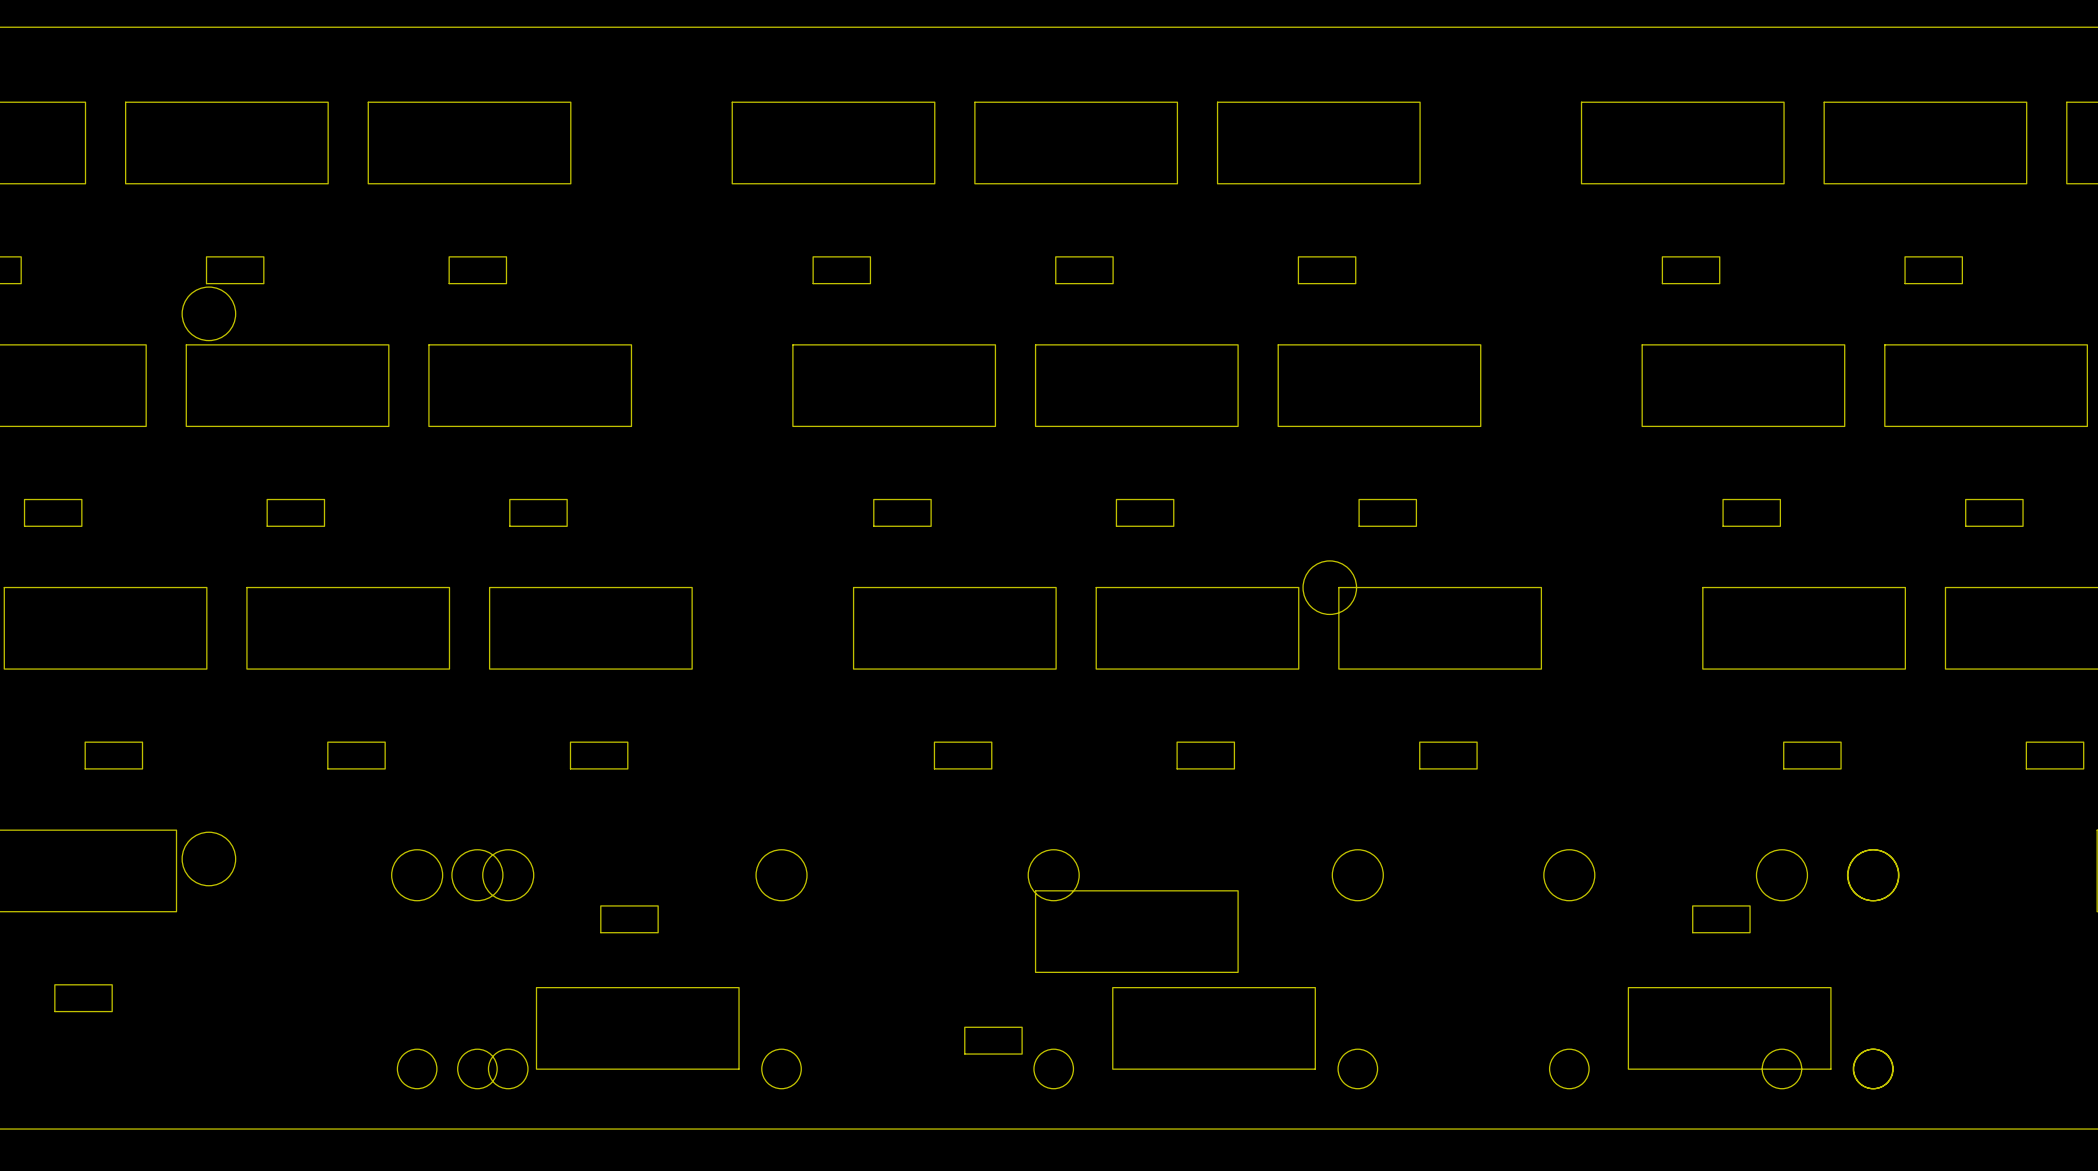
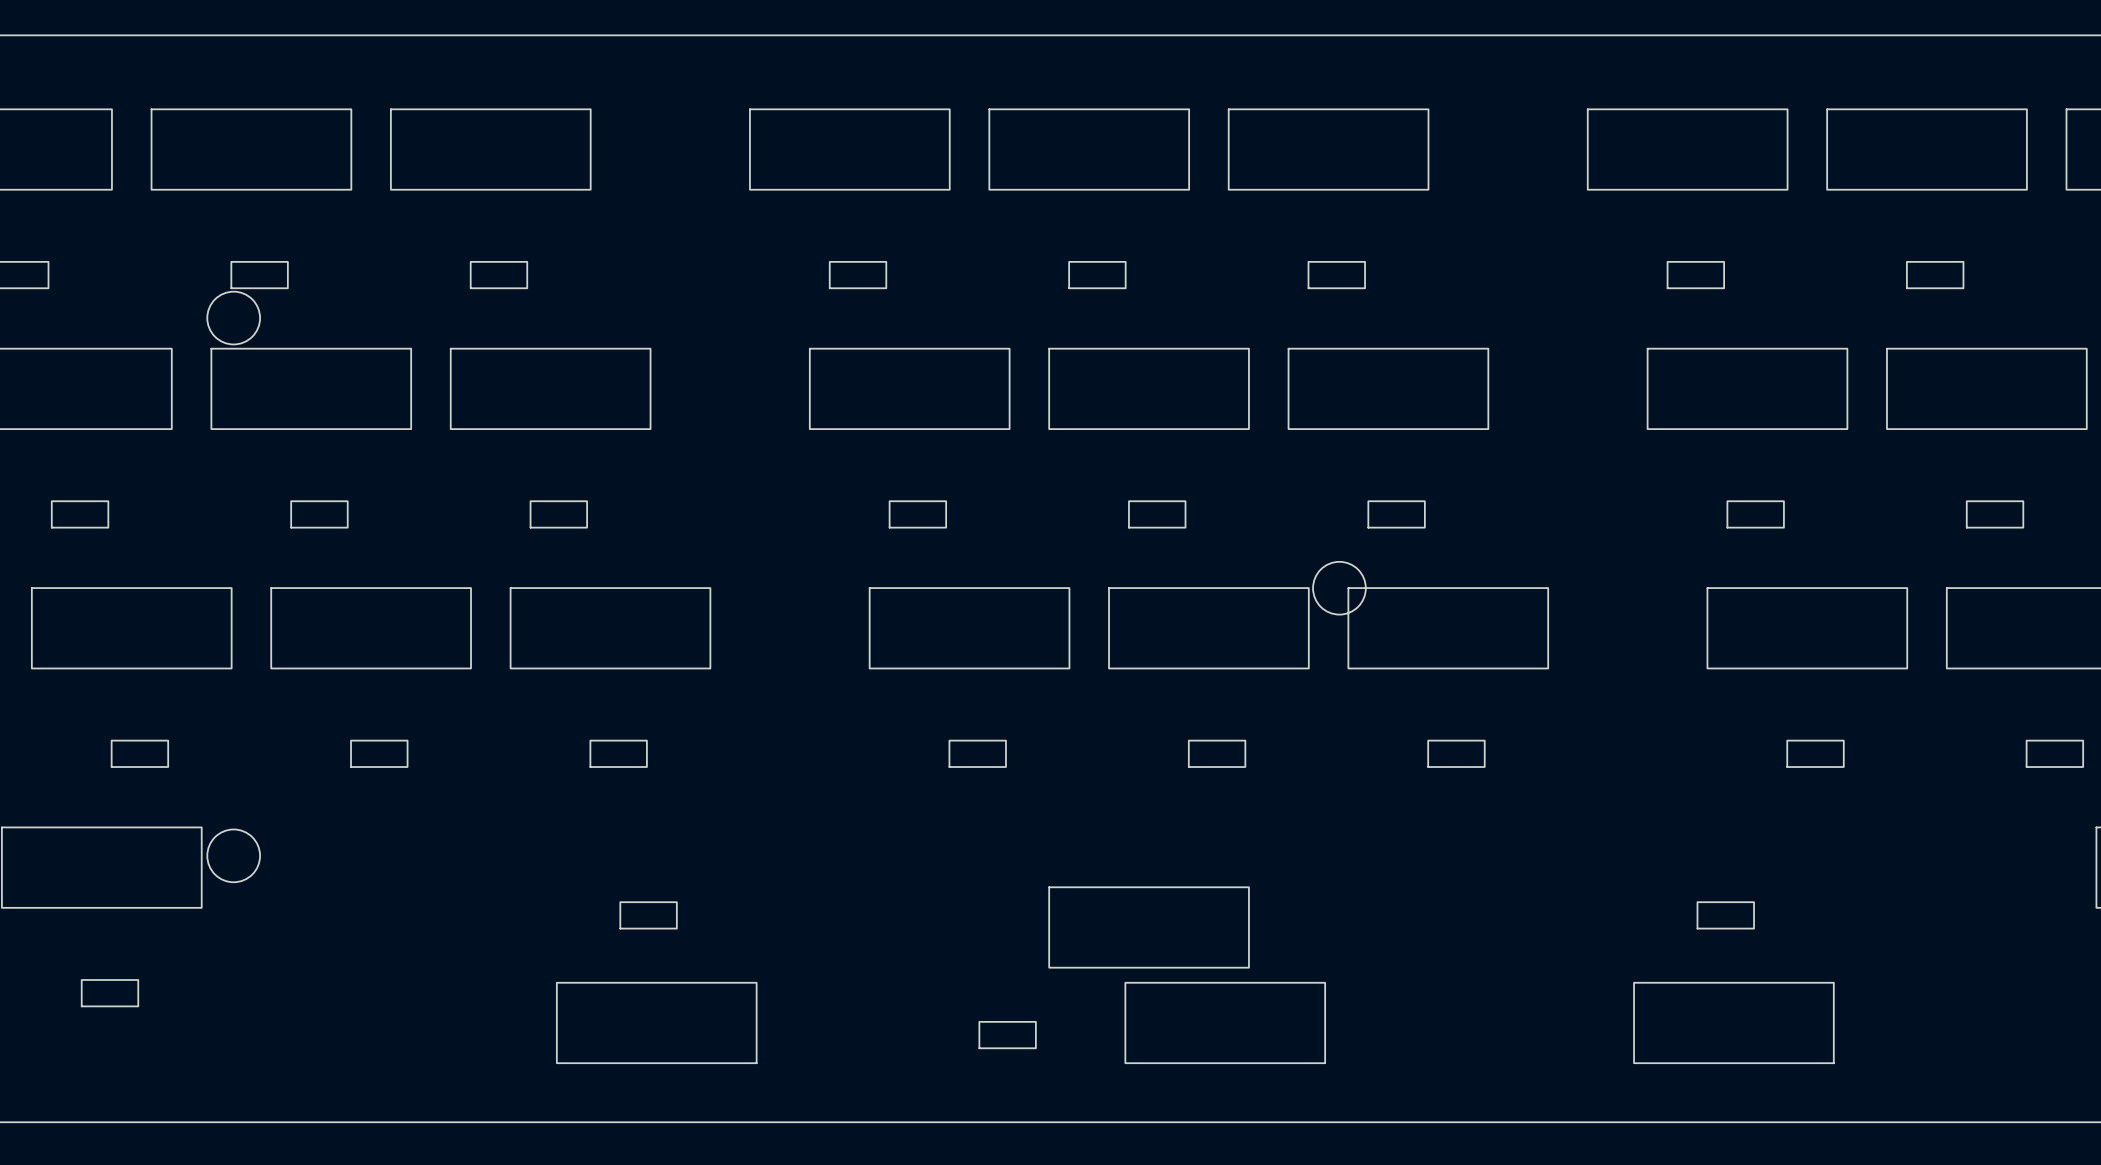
drawing: [391, 849, 1900, 1090] -> none

